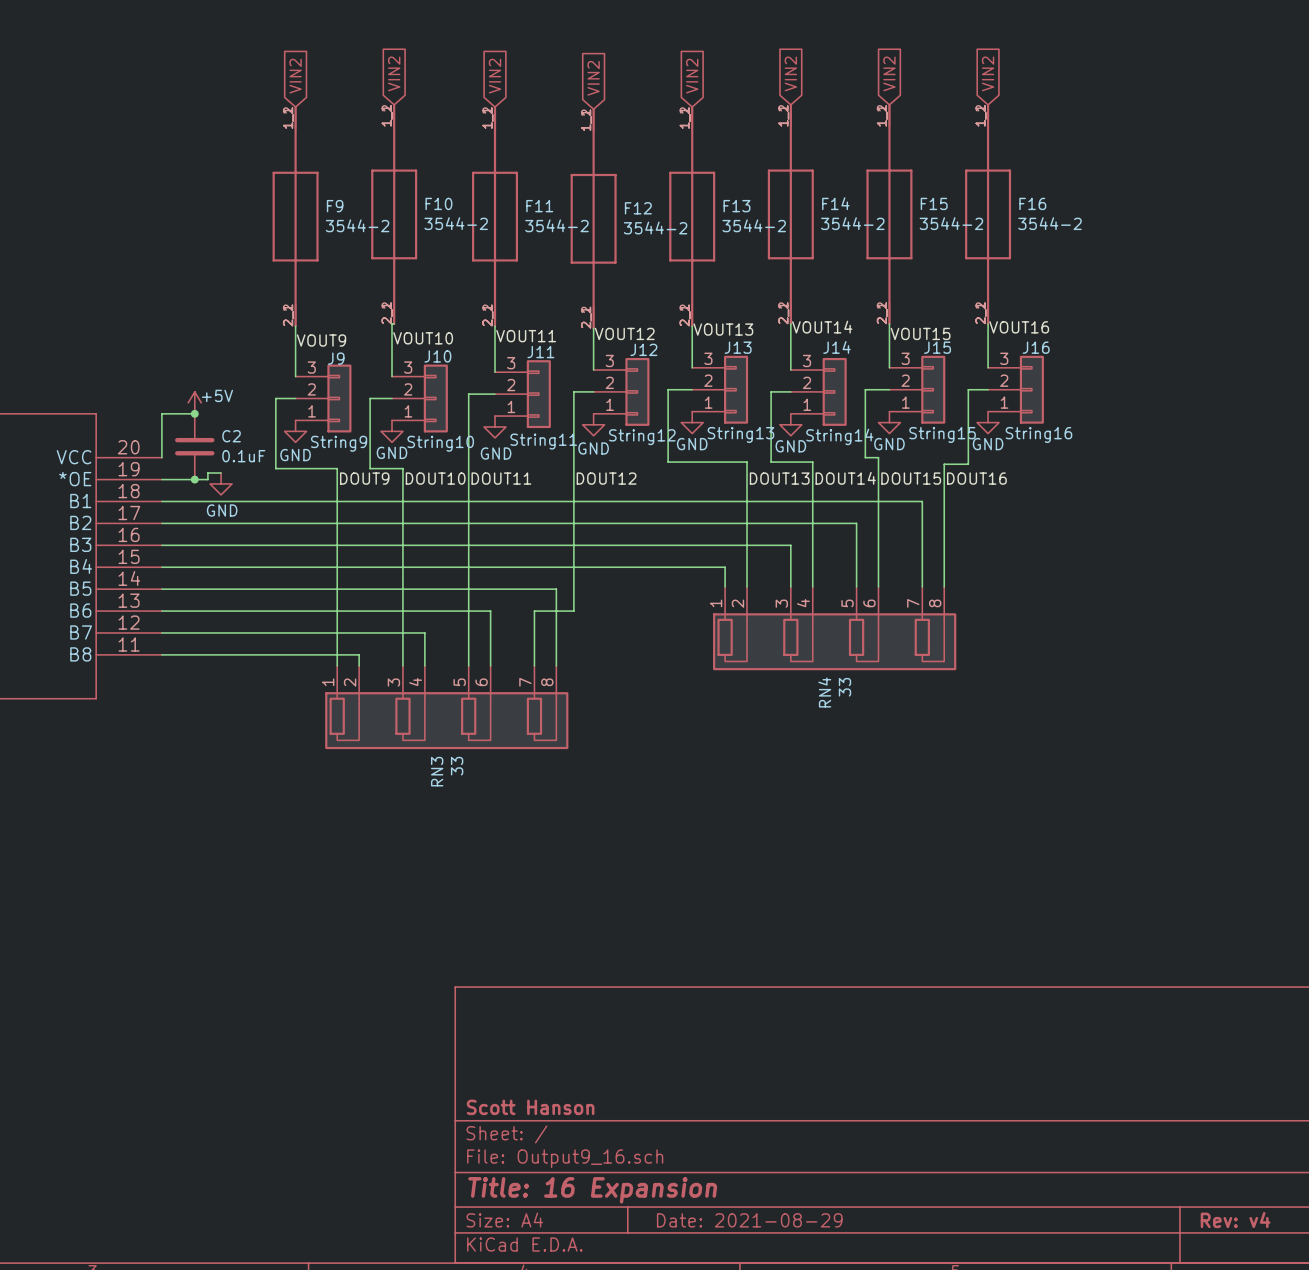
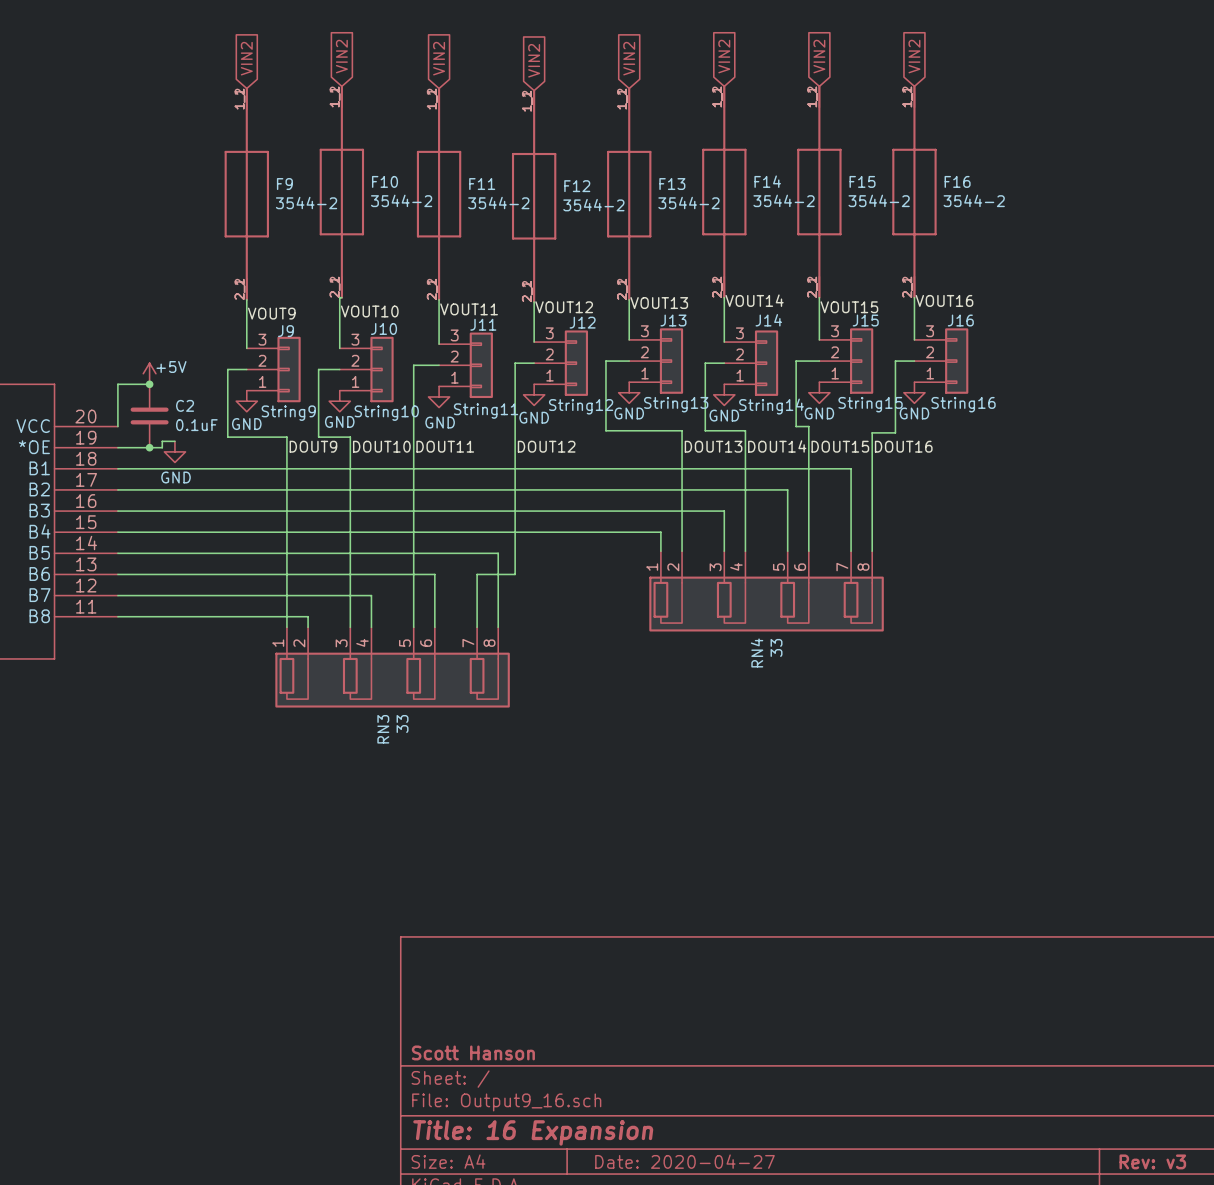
title block: Date: 2021-08-29 (749, 1220) -> Date: 2020-04-27 (684, 1161)
title block: Rev: v4 (1235, 1220) -> Rev: v3 (1152, 1161)

